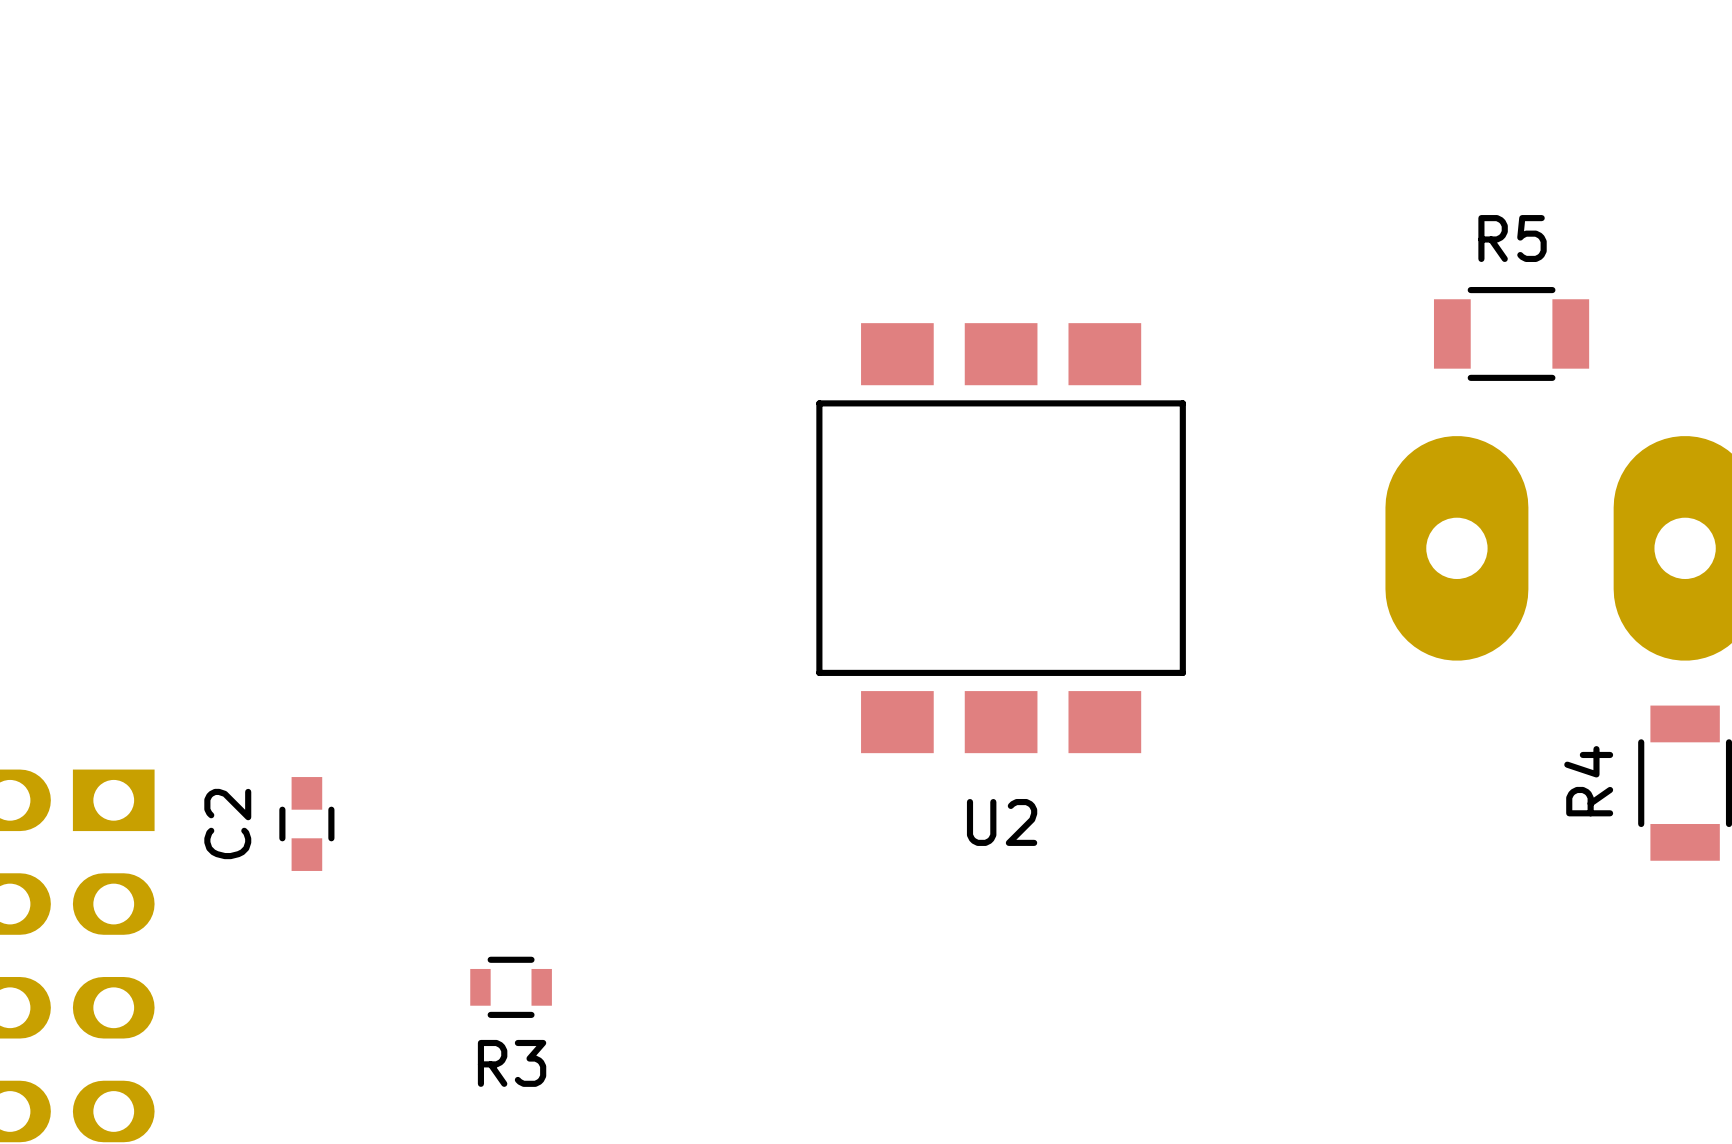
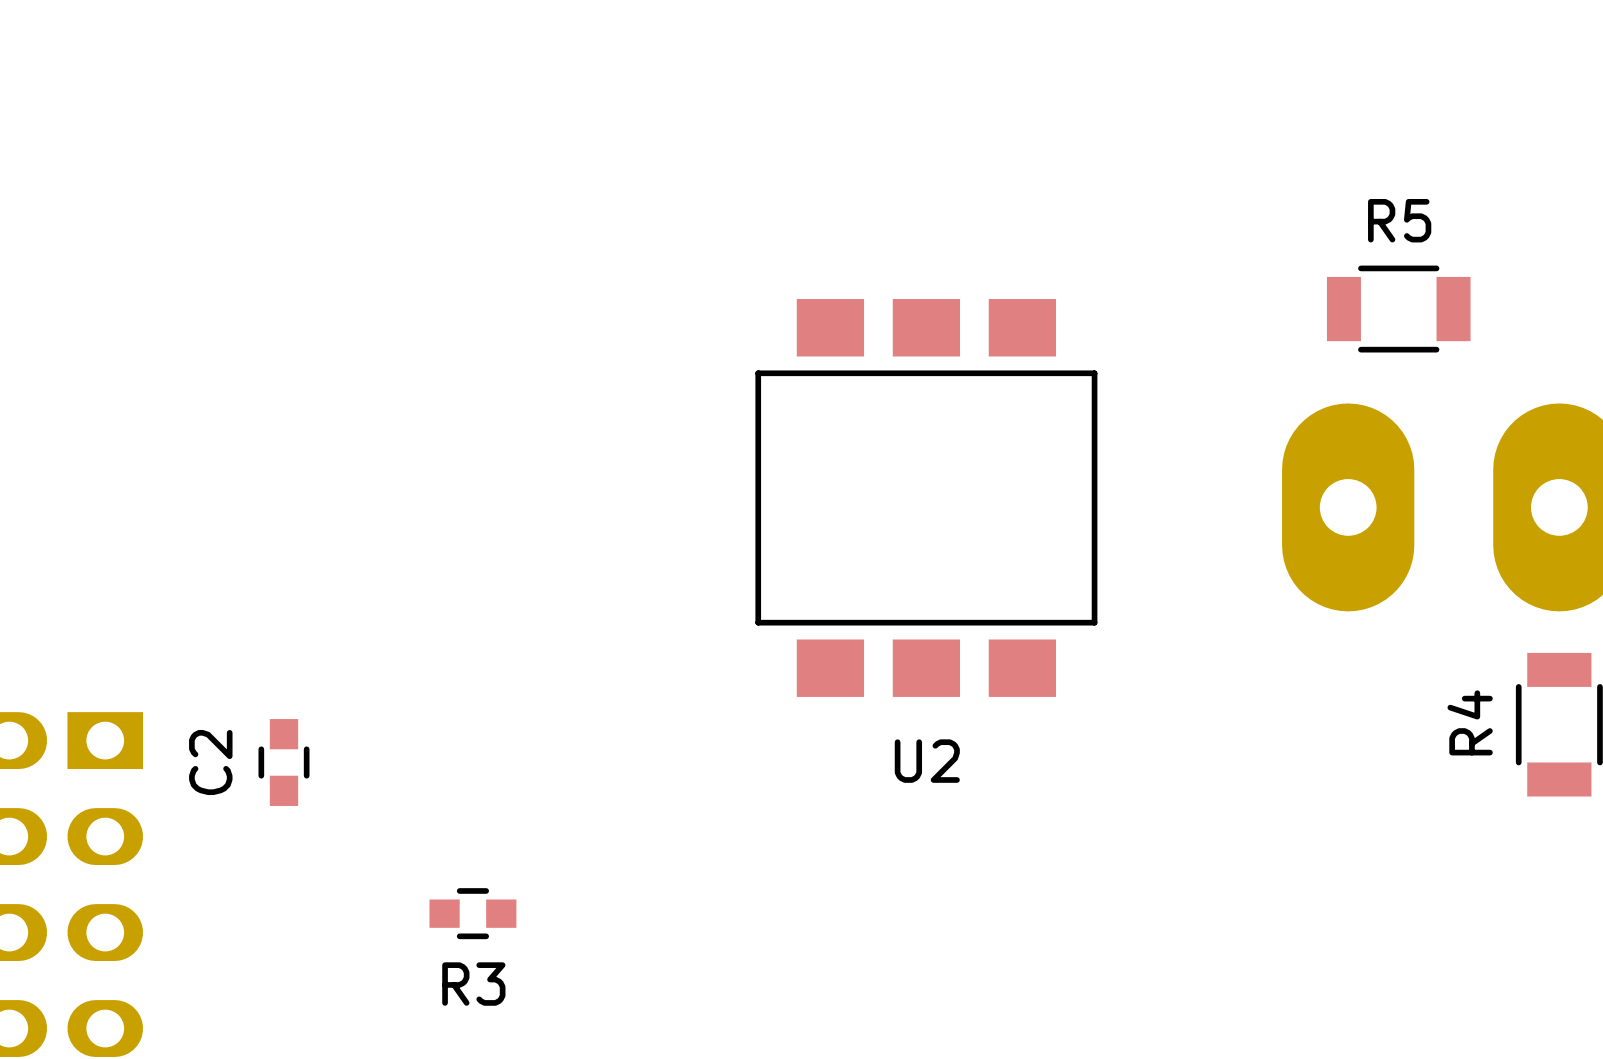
R3 footprint: [470, 956, 552, 1018] -> [429, 888, 517, 940]

